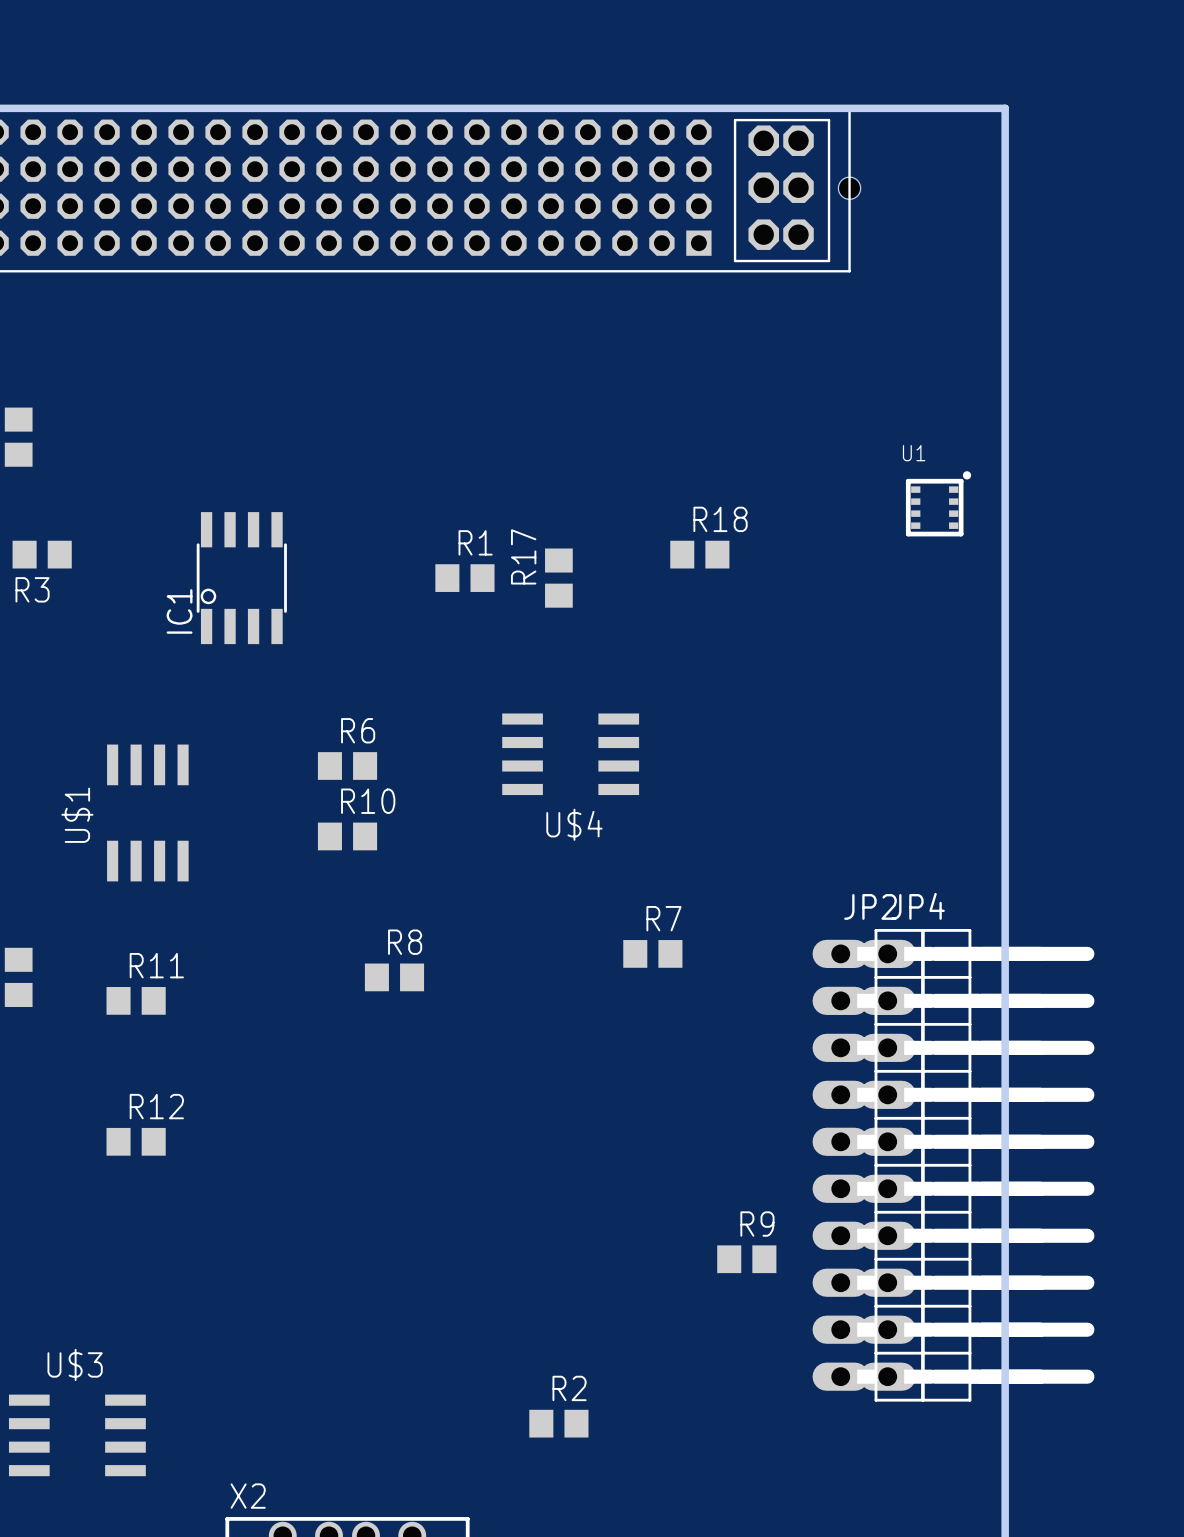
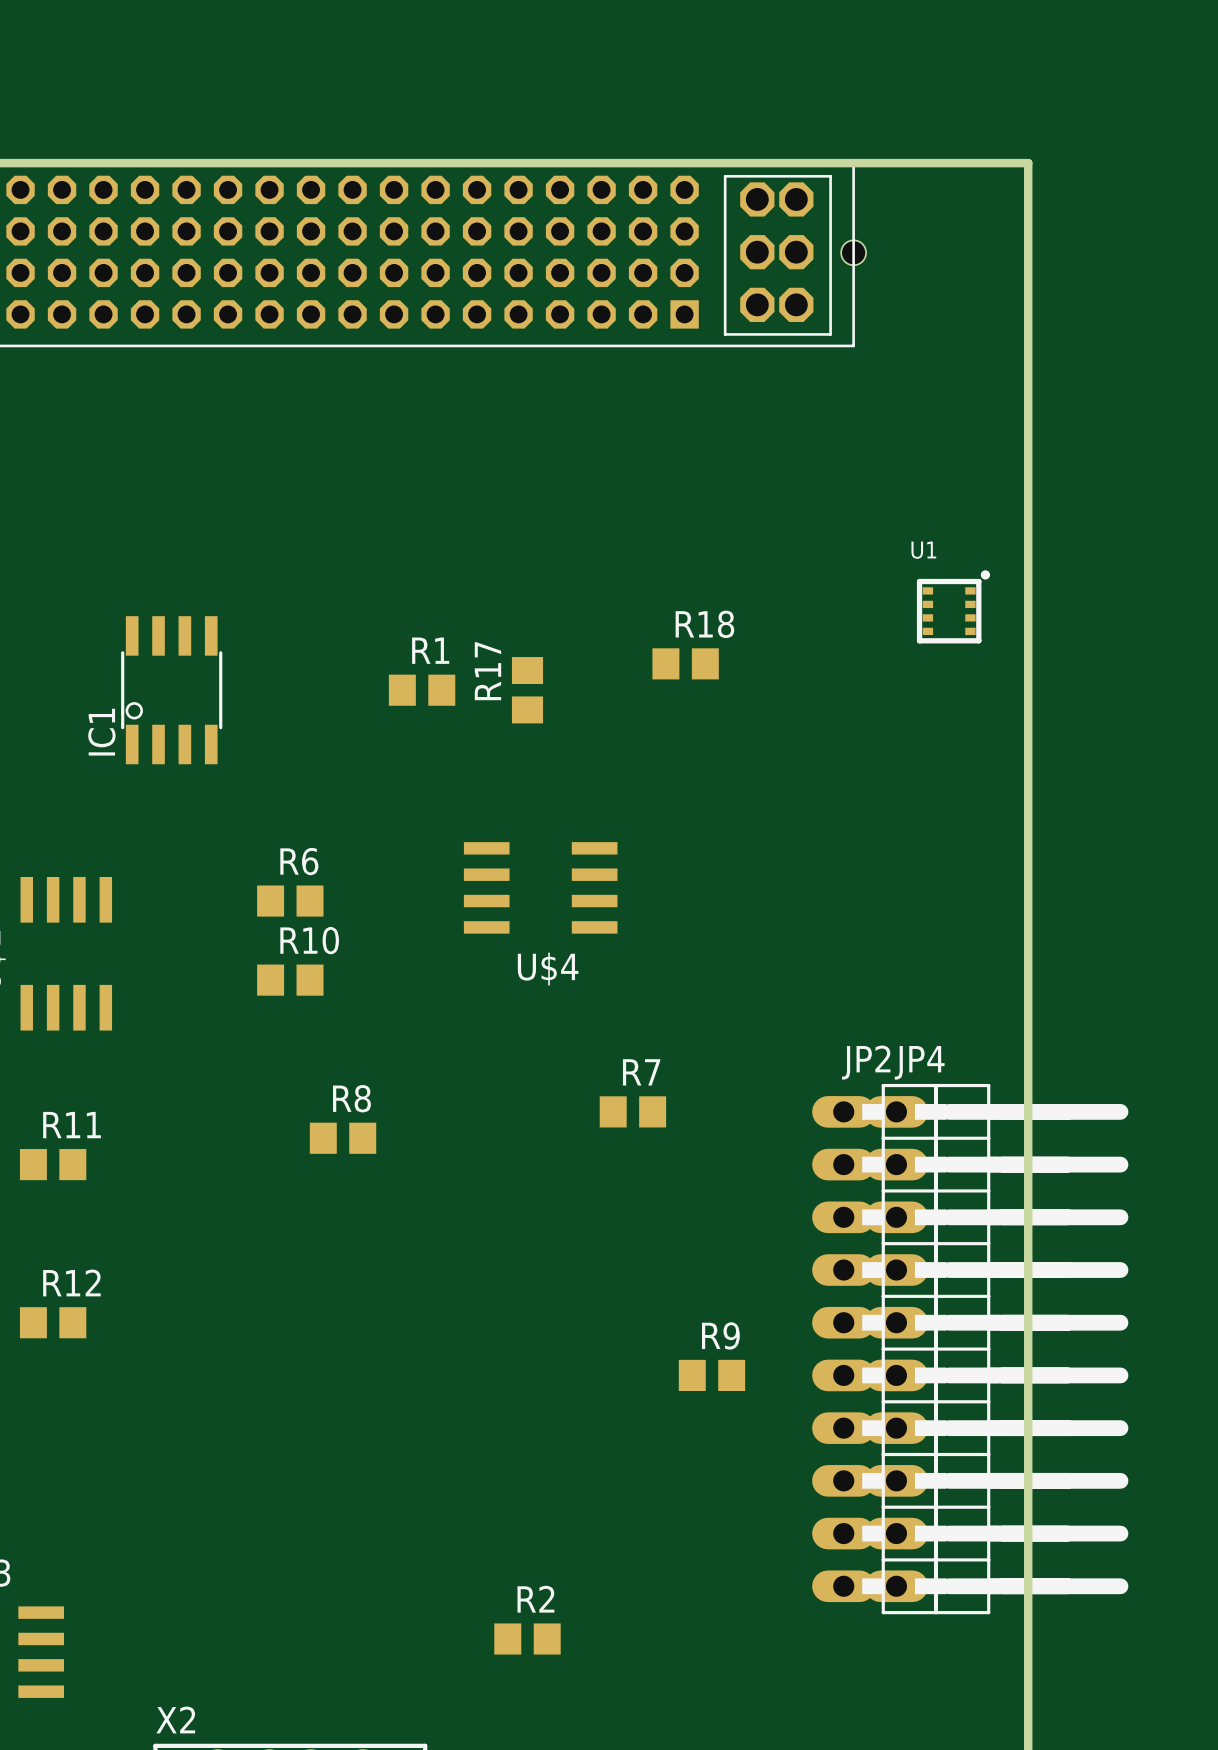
R9 position: (746, 1259) -> (711, 1375)

